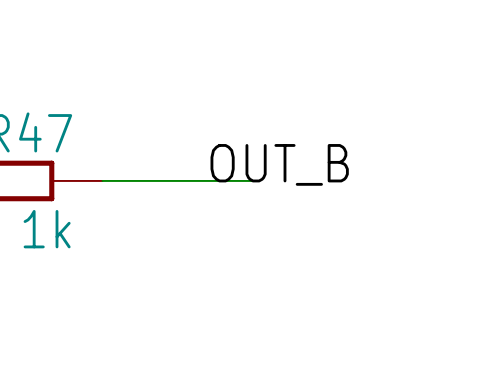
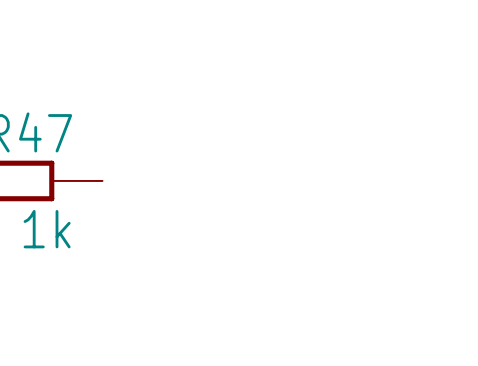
label: OUT_B (279, 164) -> none
wire: (102, 180) (254, 180) -> none

